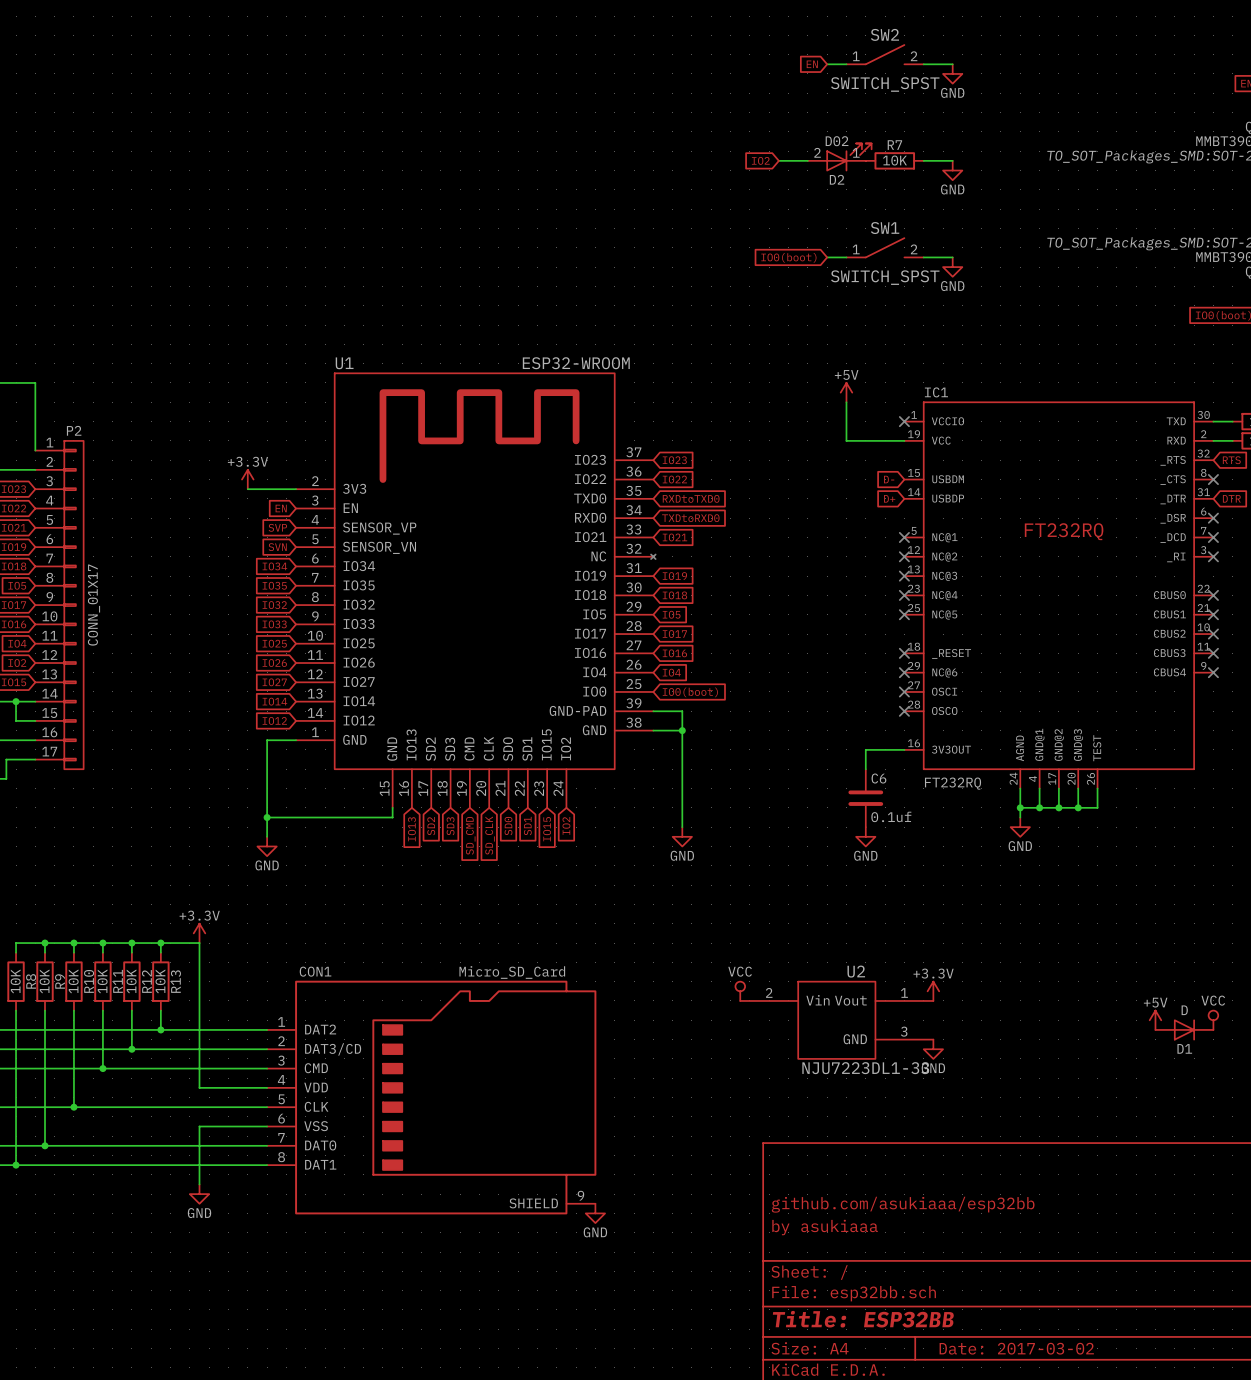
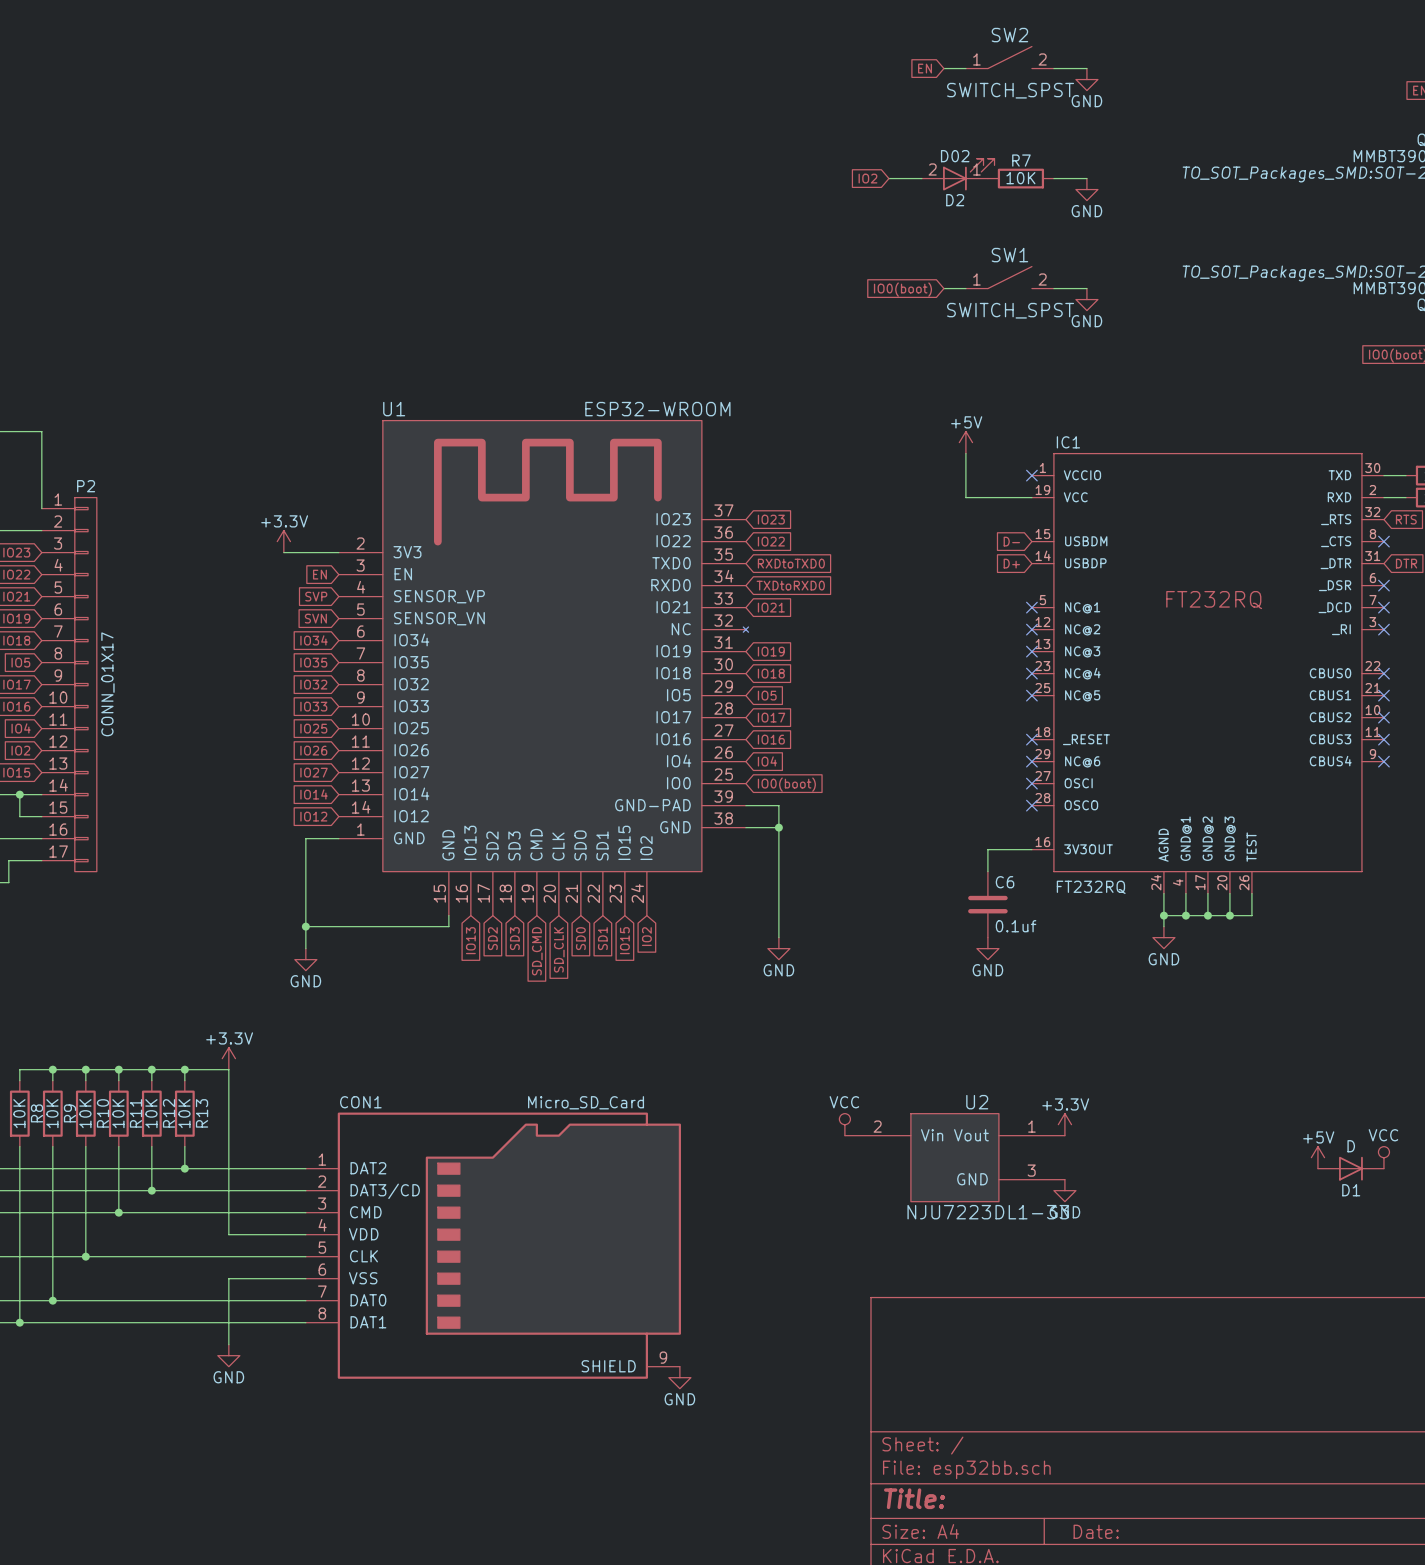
title block: github.com/asukiaaa/esp32bb (903, 1204) -> none
title block: by asukiaaa (825, 1227) -> none
title block: Title: ESP32BB (863, 1319) -> Title: (914, 1498)
title block: Date: 2017-03-02 (1016, 1348) -> Date: (1096, 1531)

